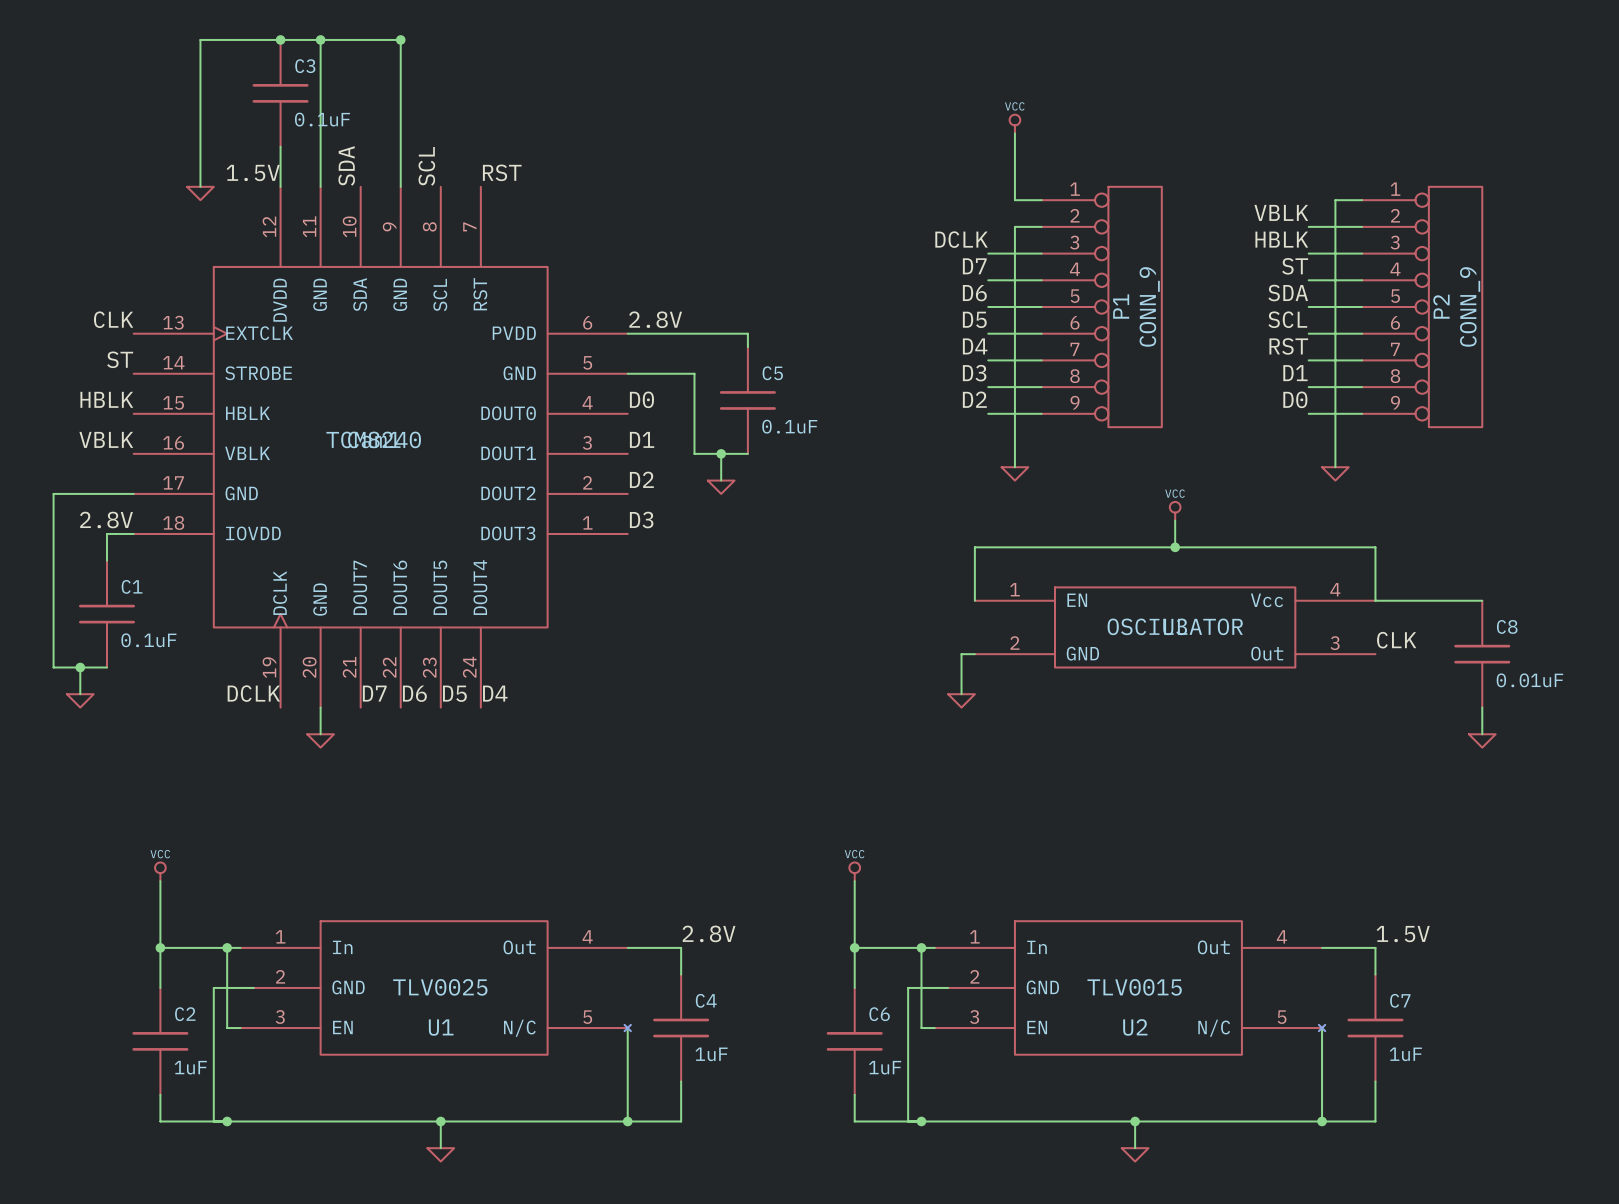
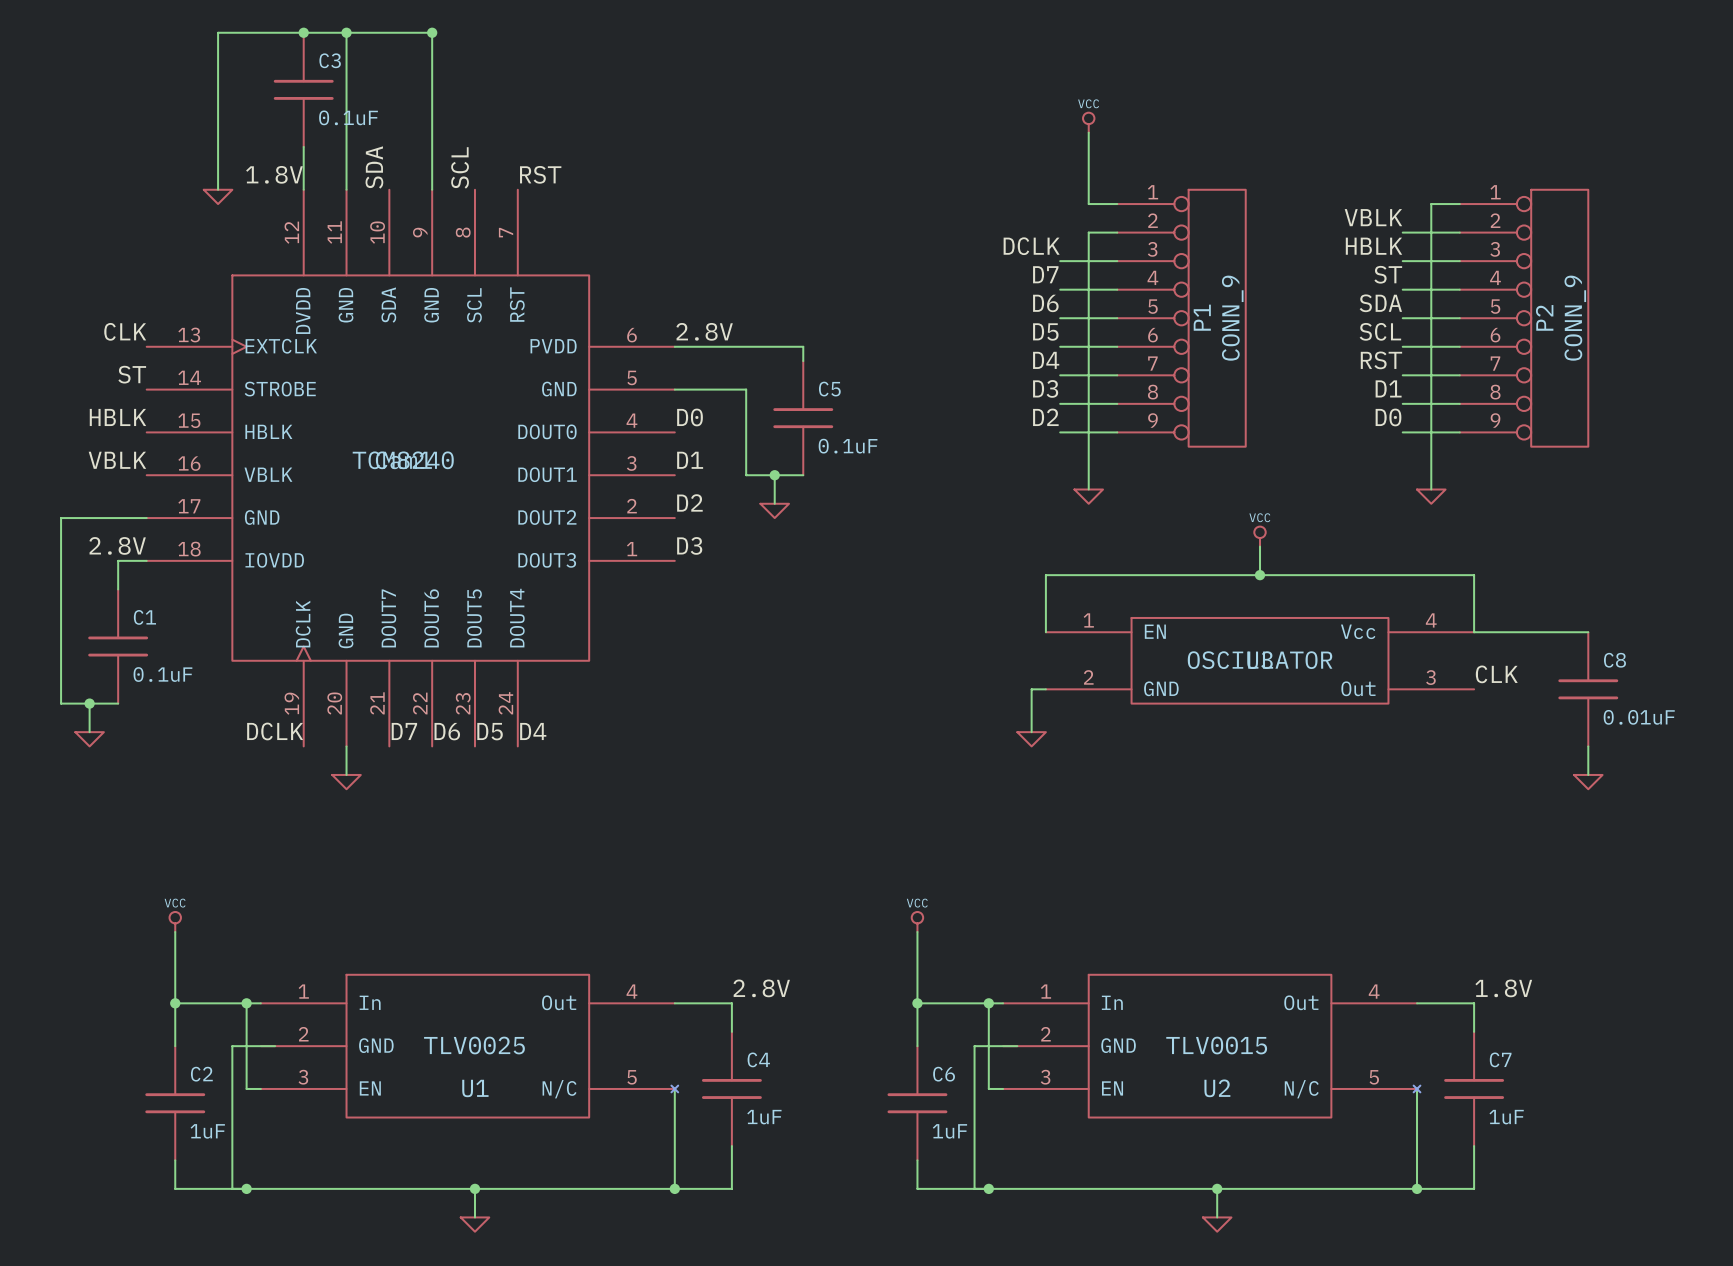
label: 1.5V (253, 172) -> 1.8V (274, 174)
label: 1.5V (1403, 934) -> 1.8V (1503, 988)

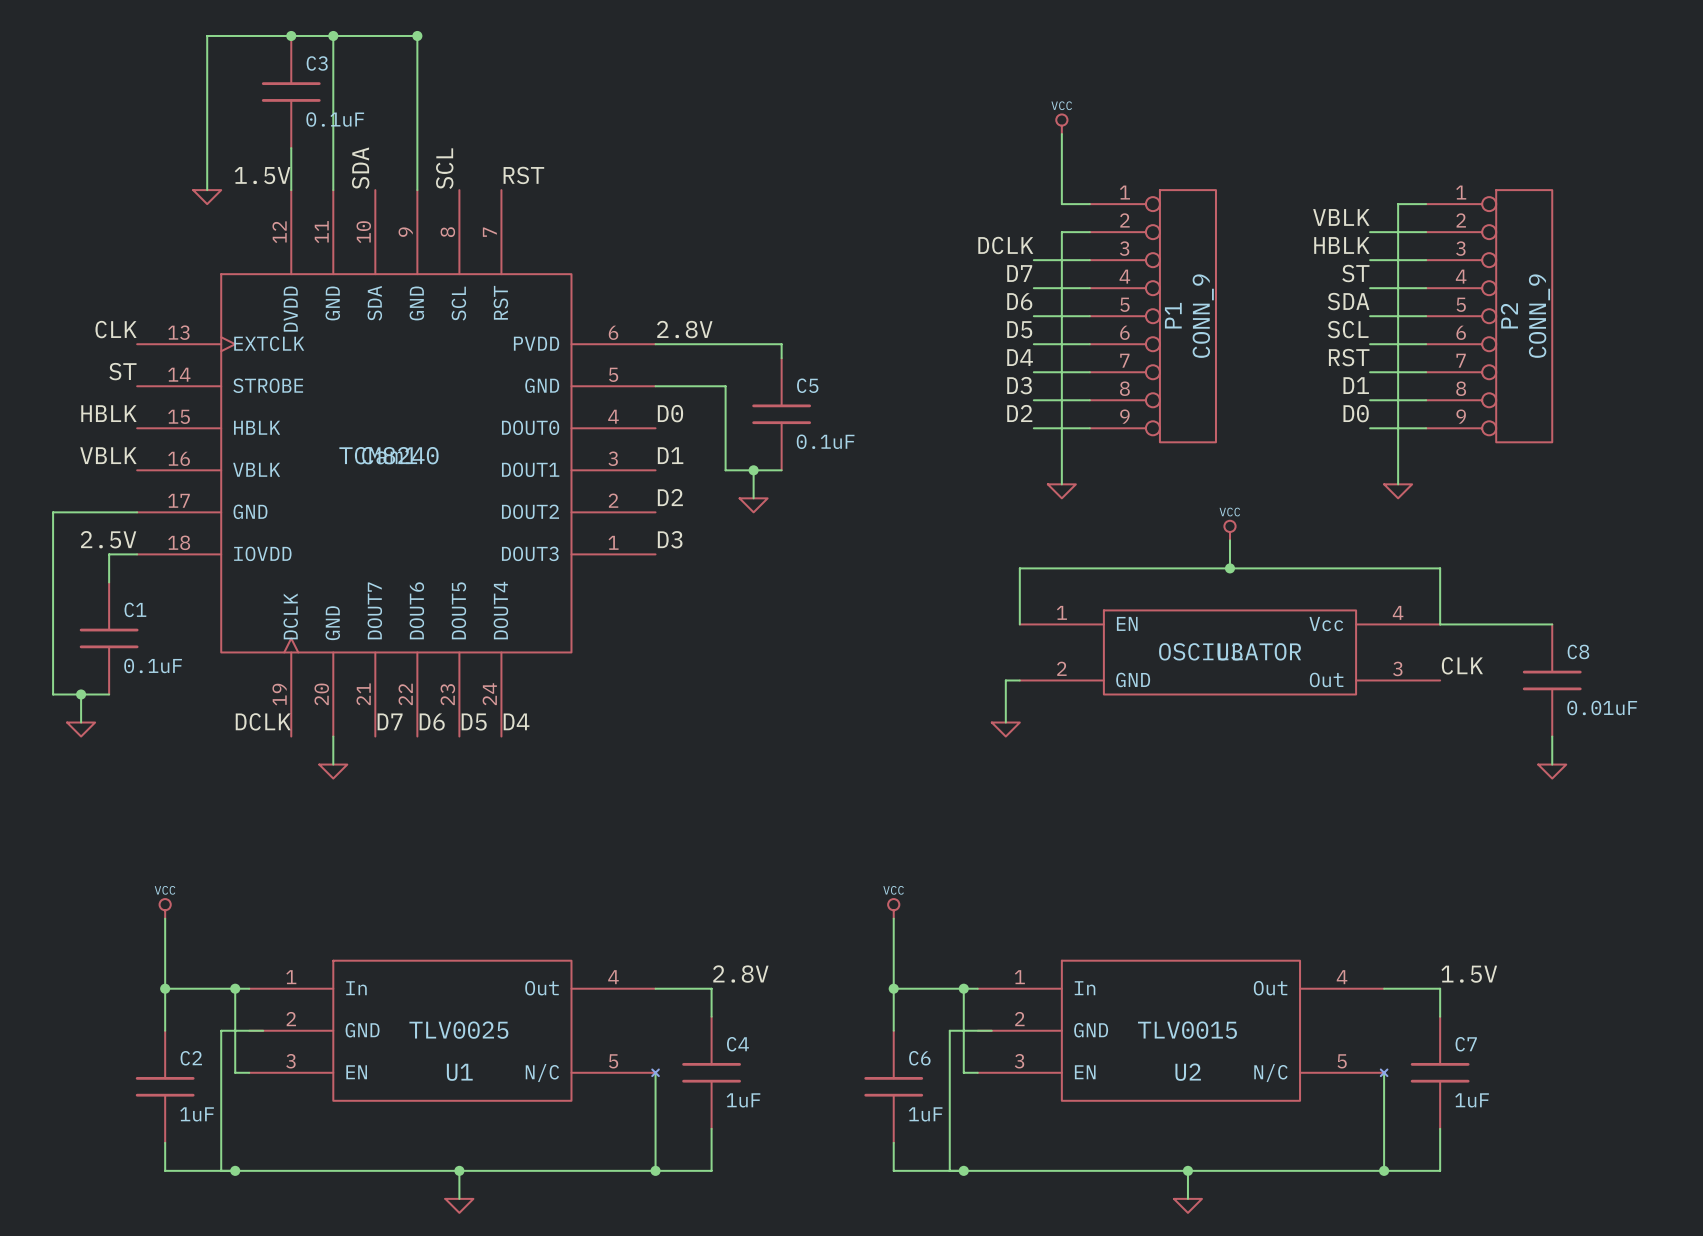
label: 1.8V (274, 174) -> 1.5V (262, 175)
label: 2.8V (117, 545) -> 2.5V (108, 539)
label: 1.8V (1503, 988) -> 1.5V (1469, 974)

